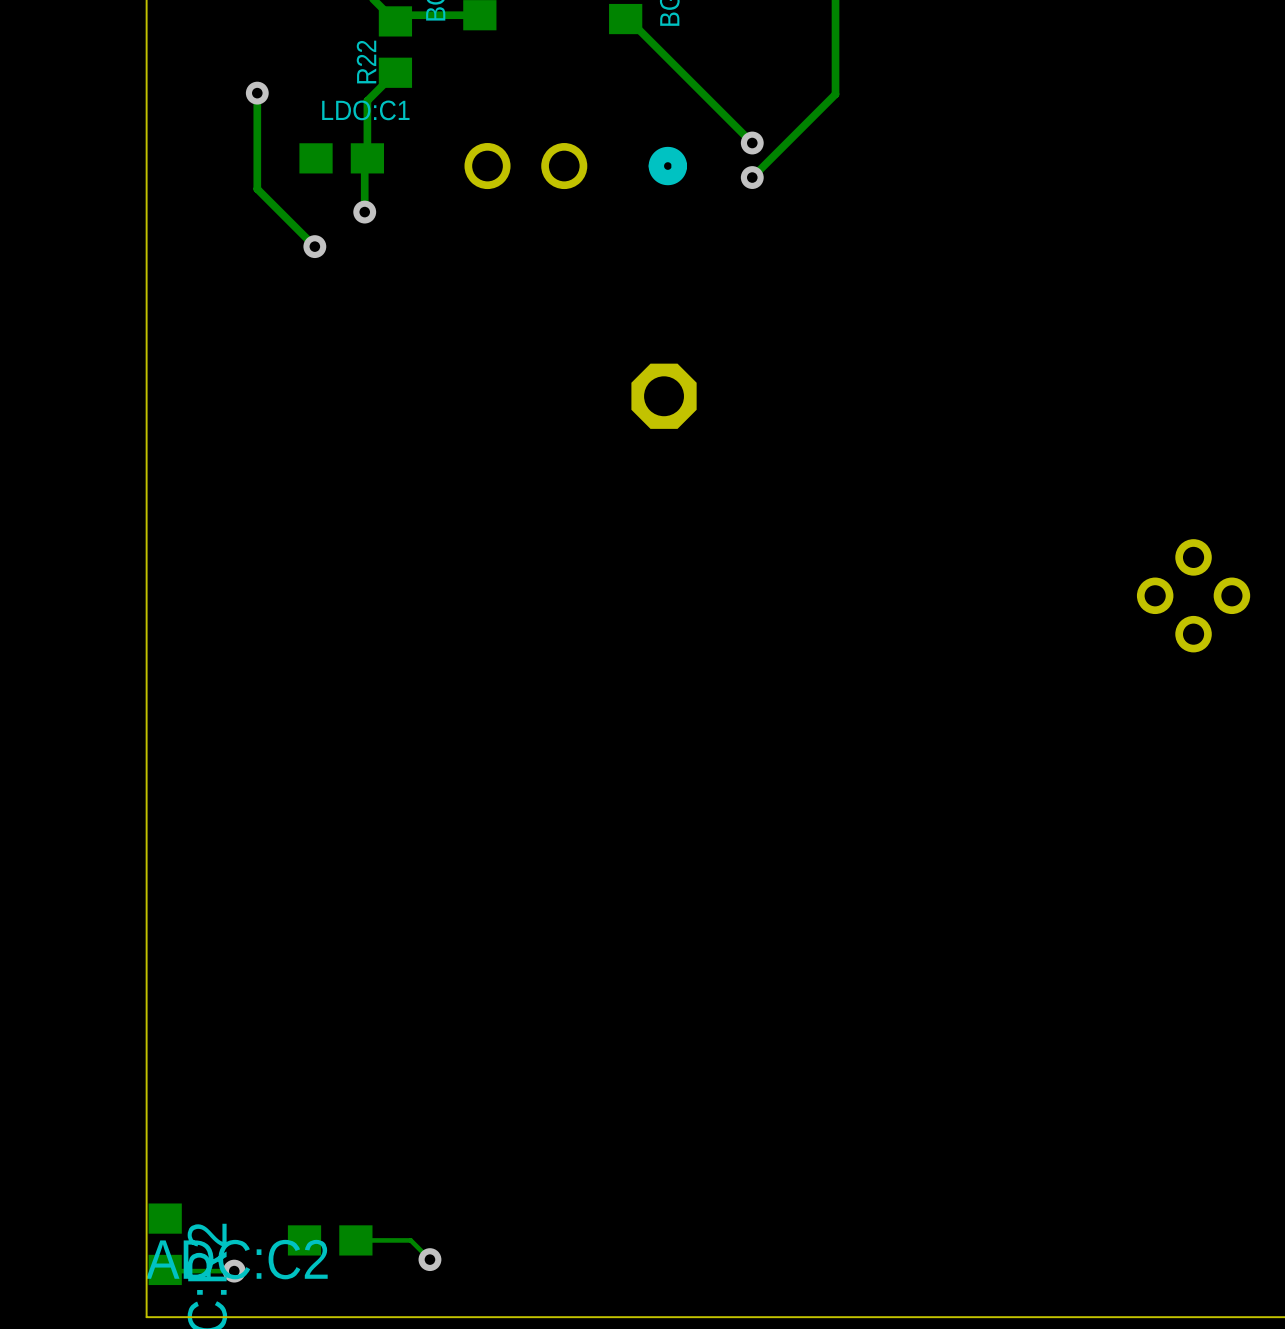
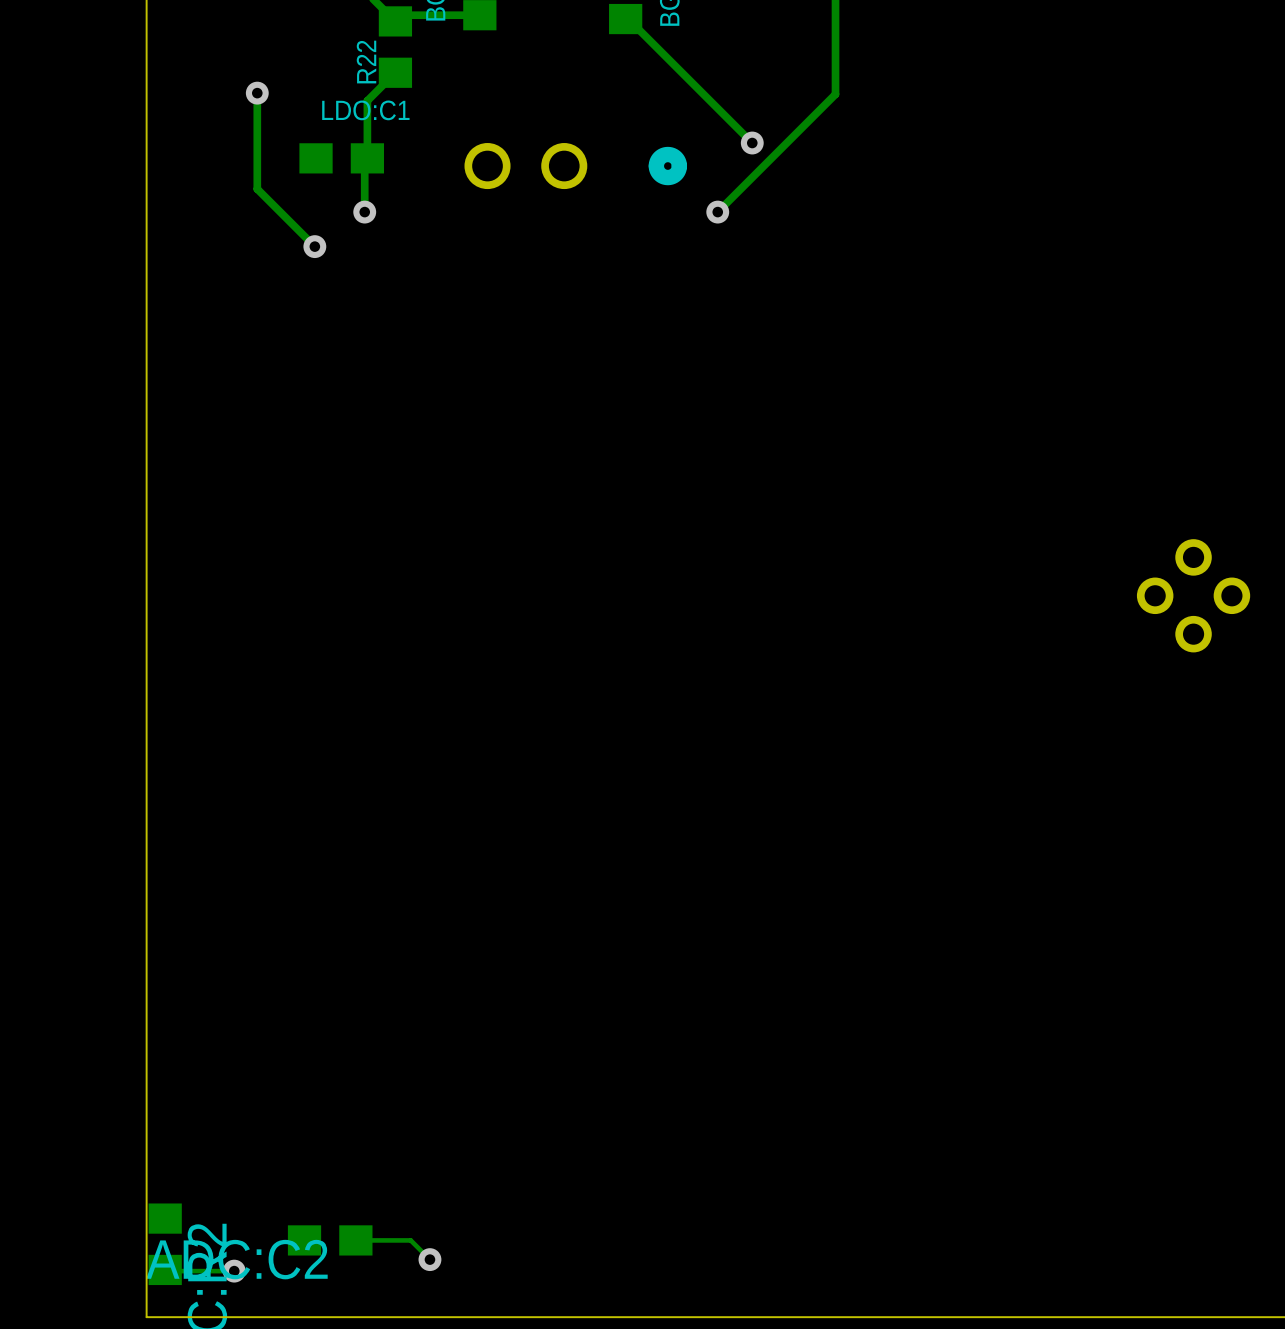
track: none -> (752, 177) (717, 212)
via position: (752, 177) -> (717, 212)
part: (664, 396) -> none

